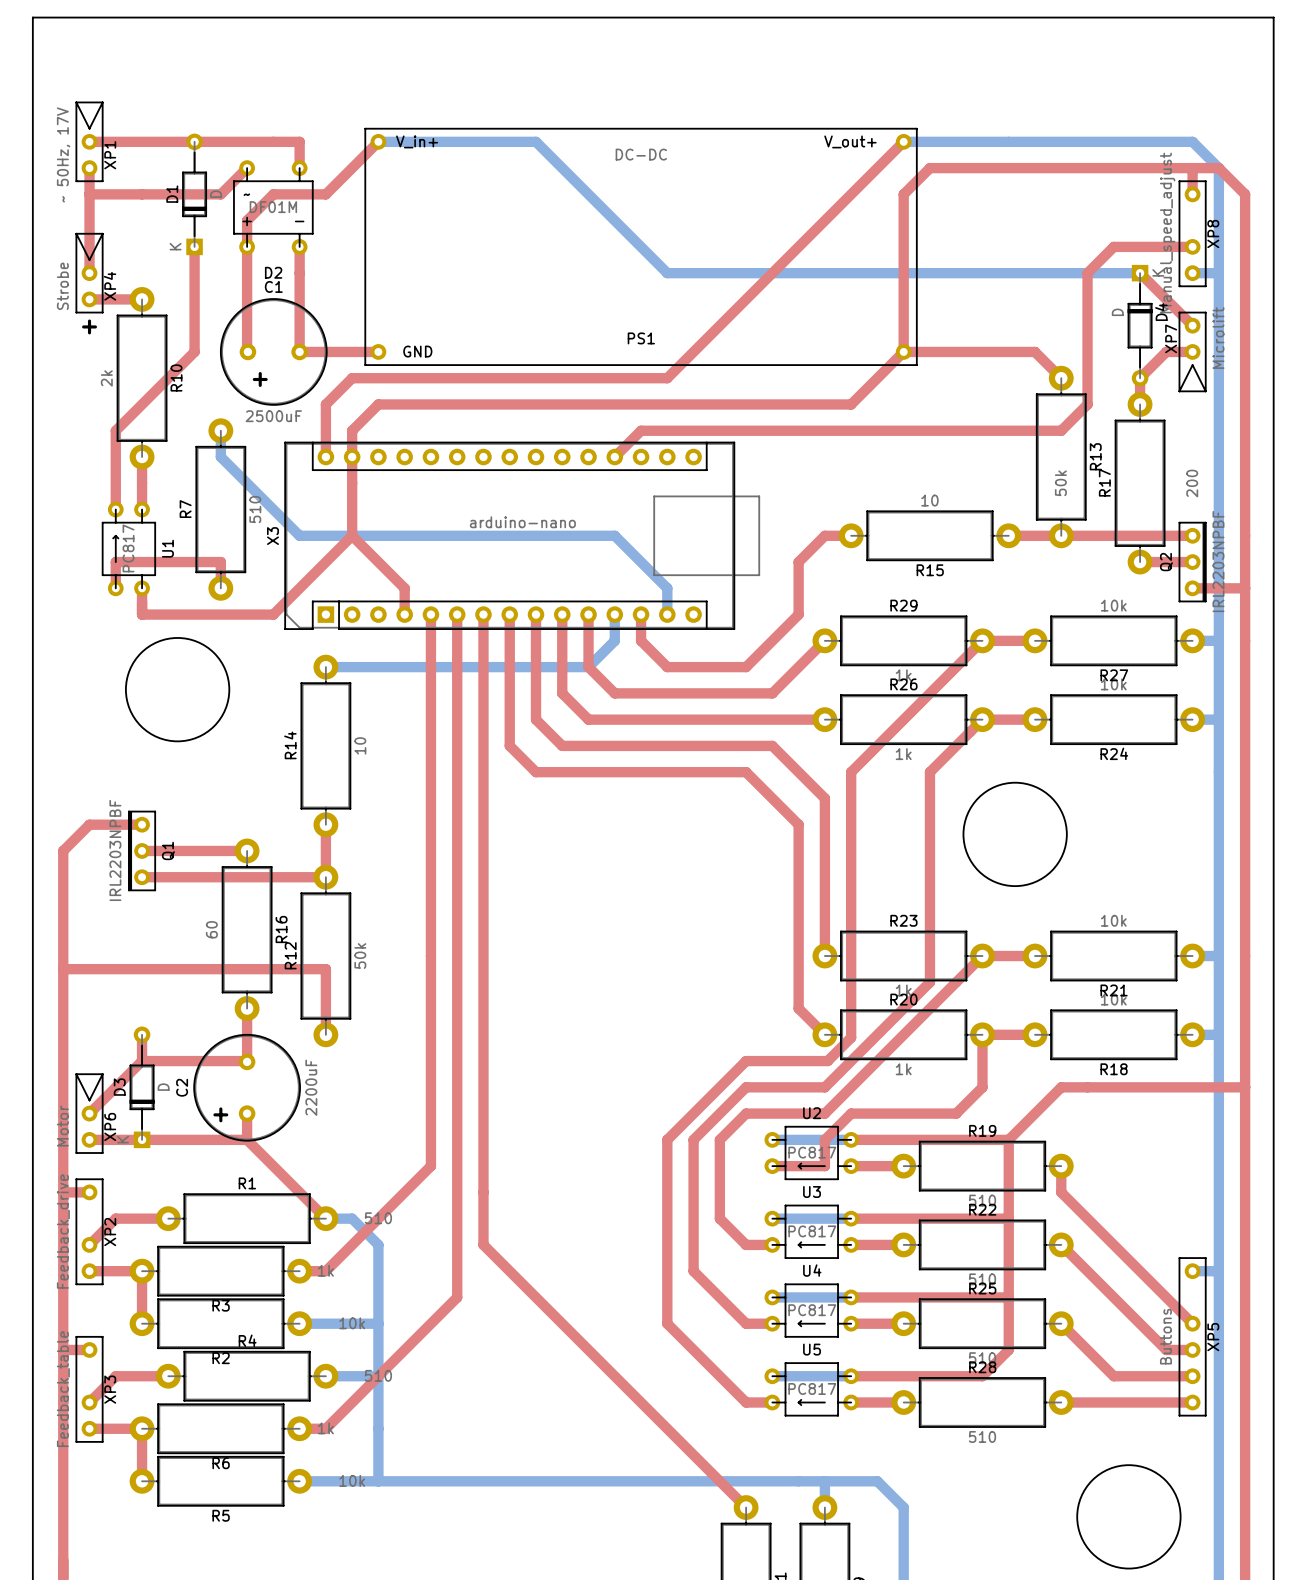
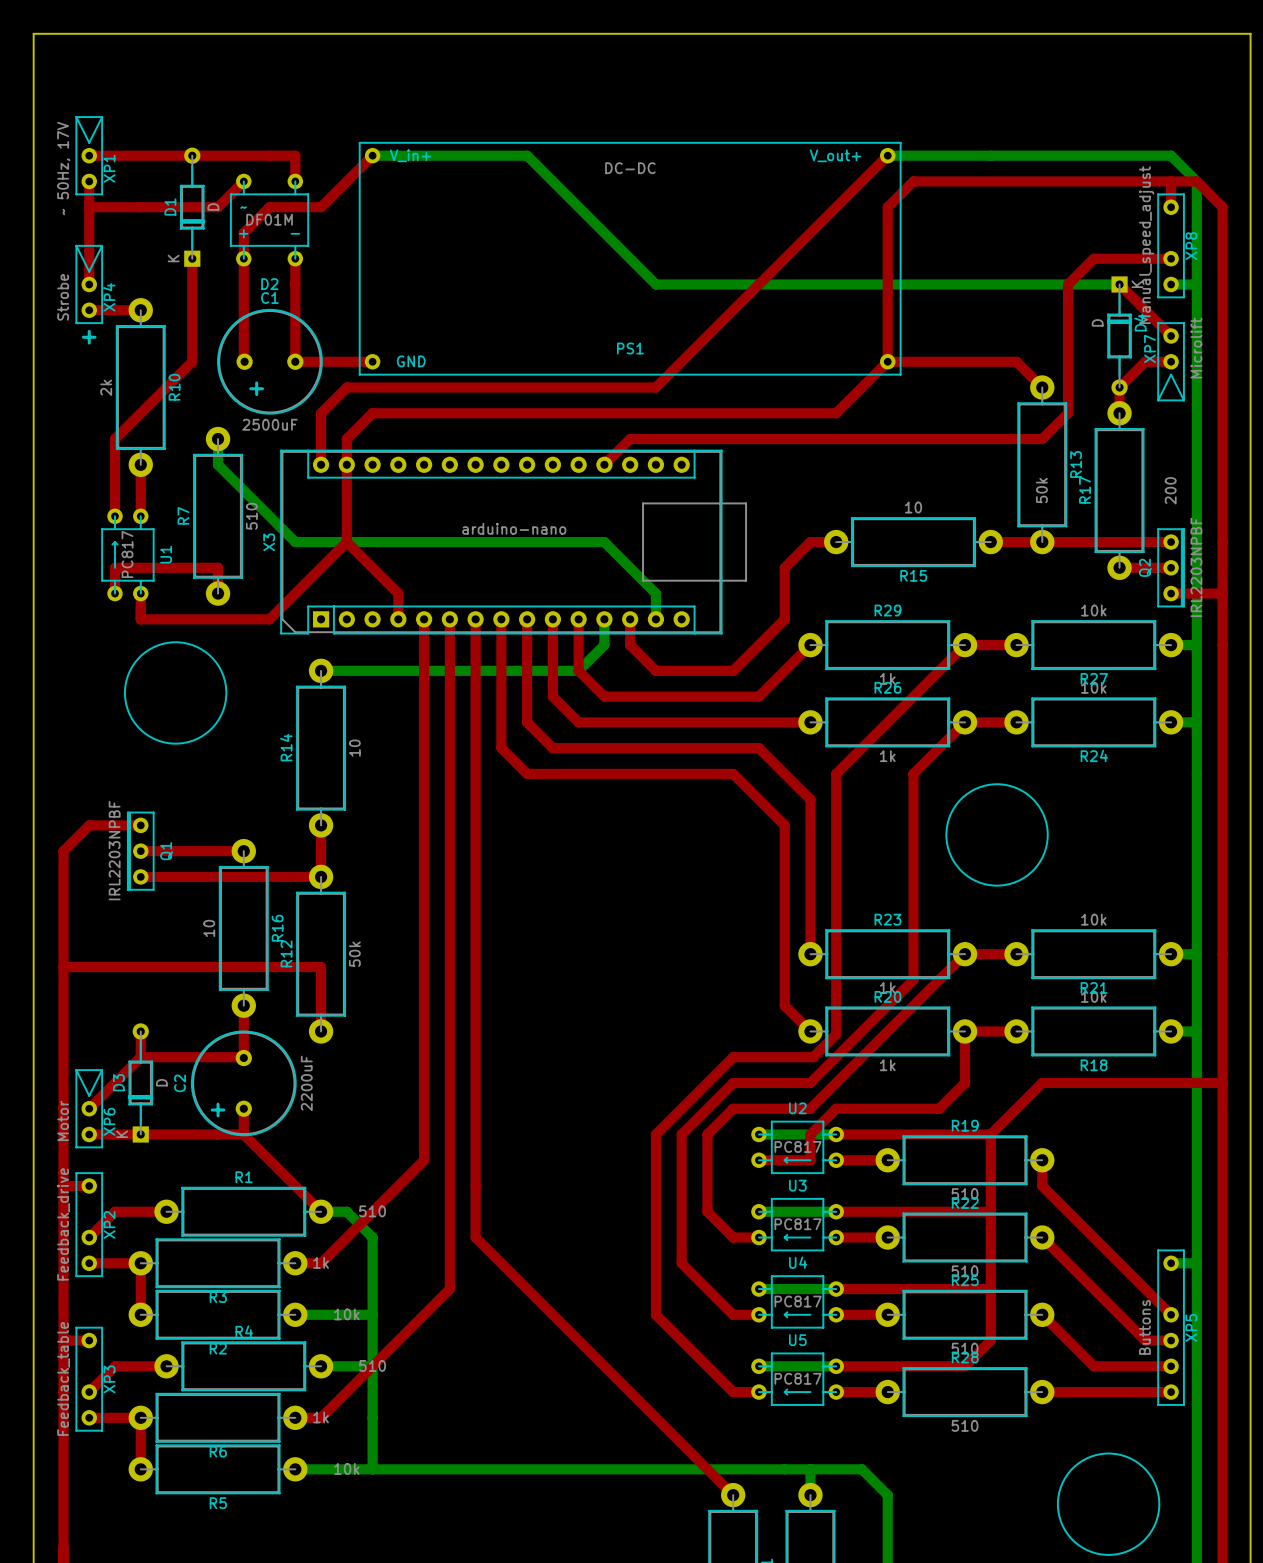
R16 value: 60 (211, 929) -> 10 (209, 928)

